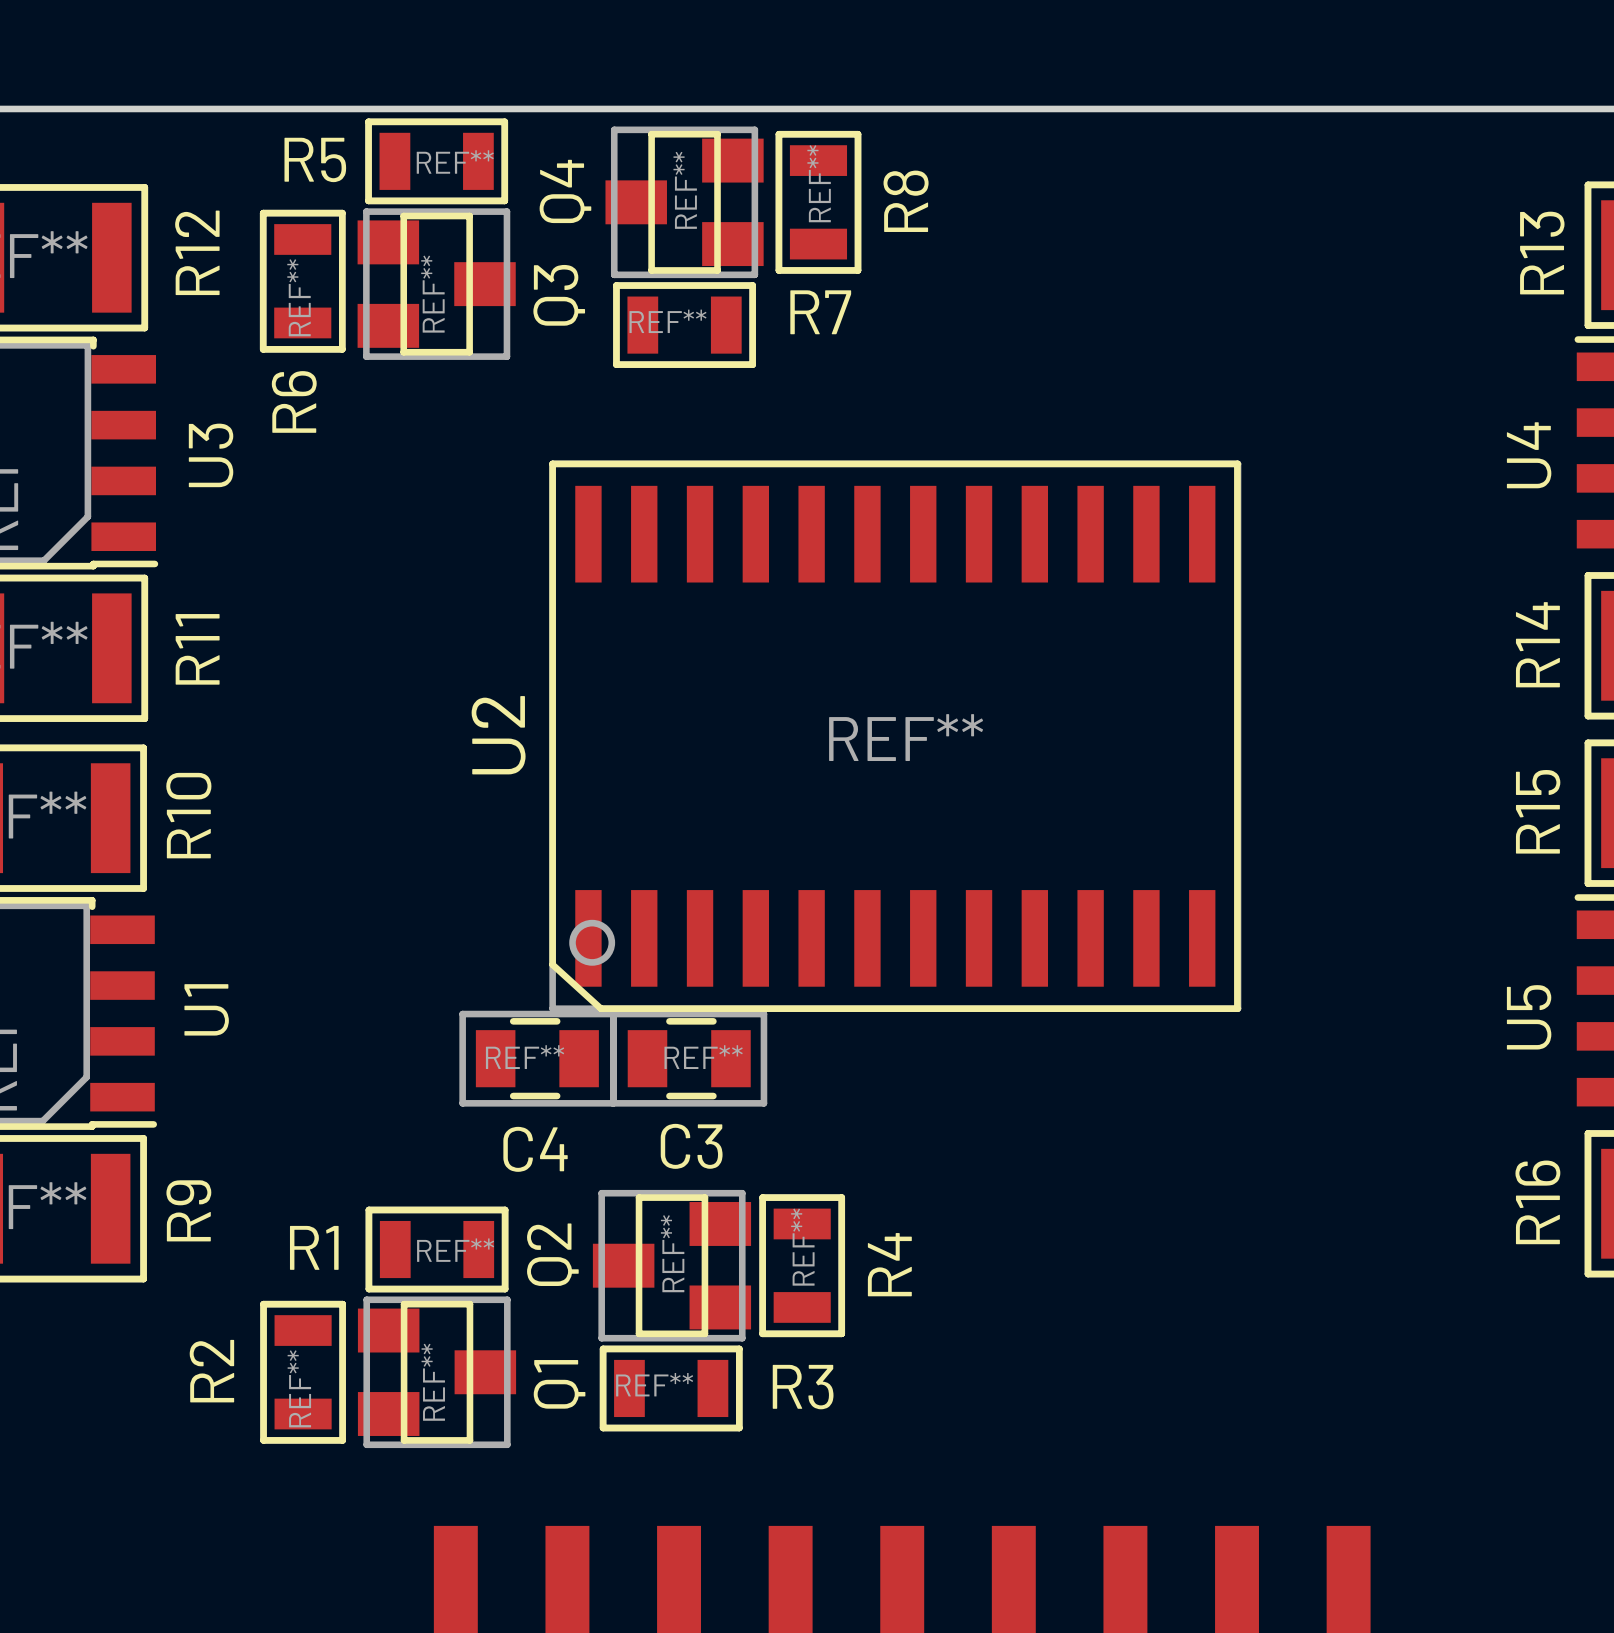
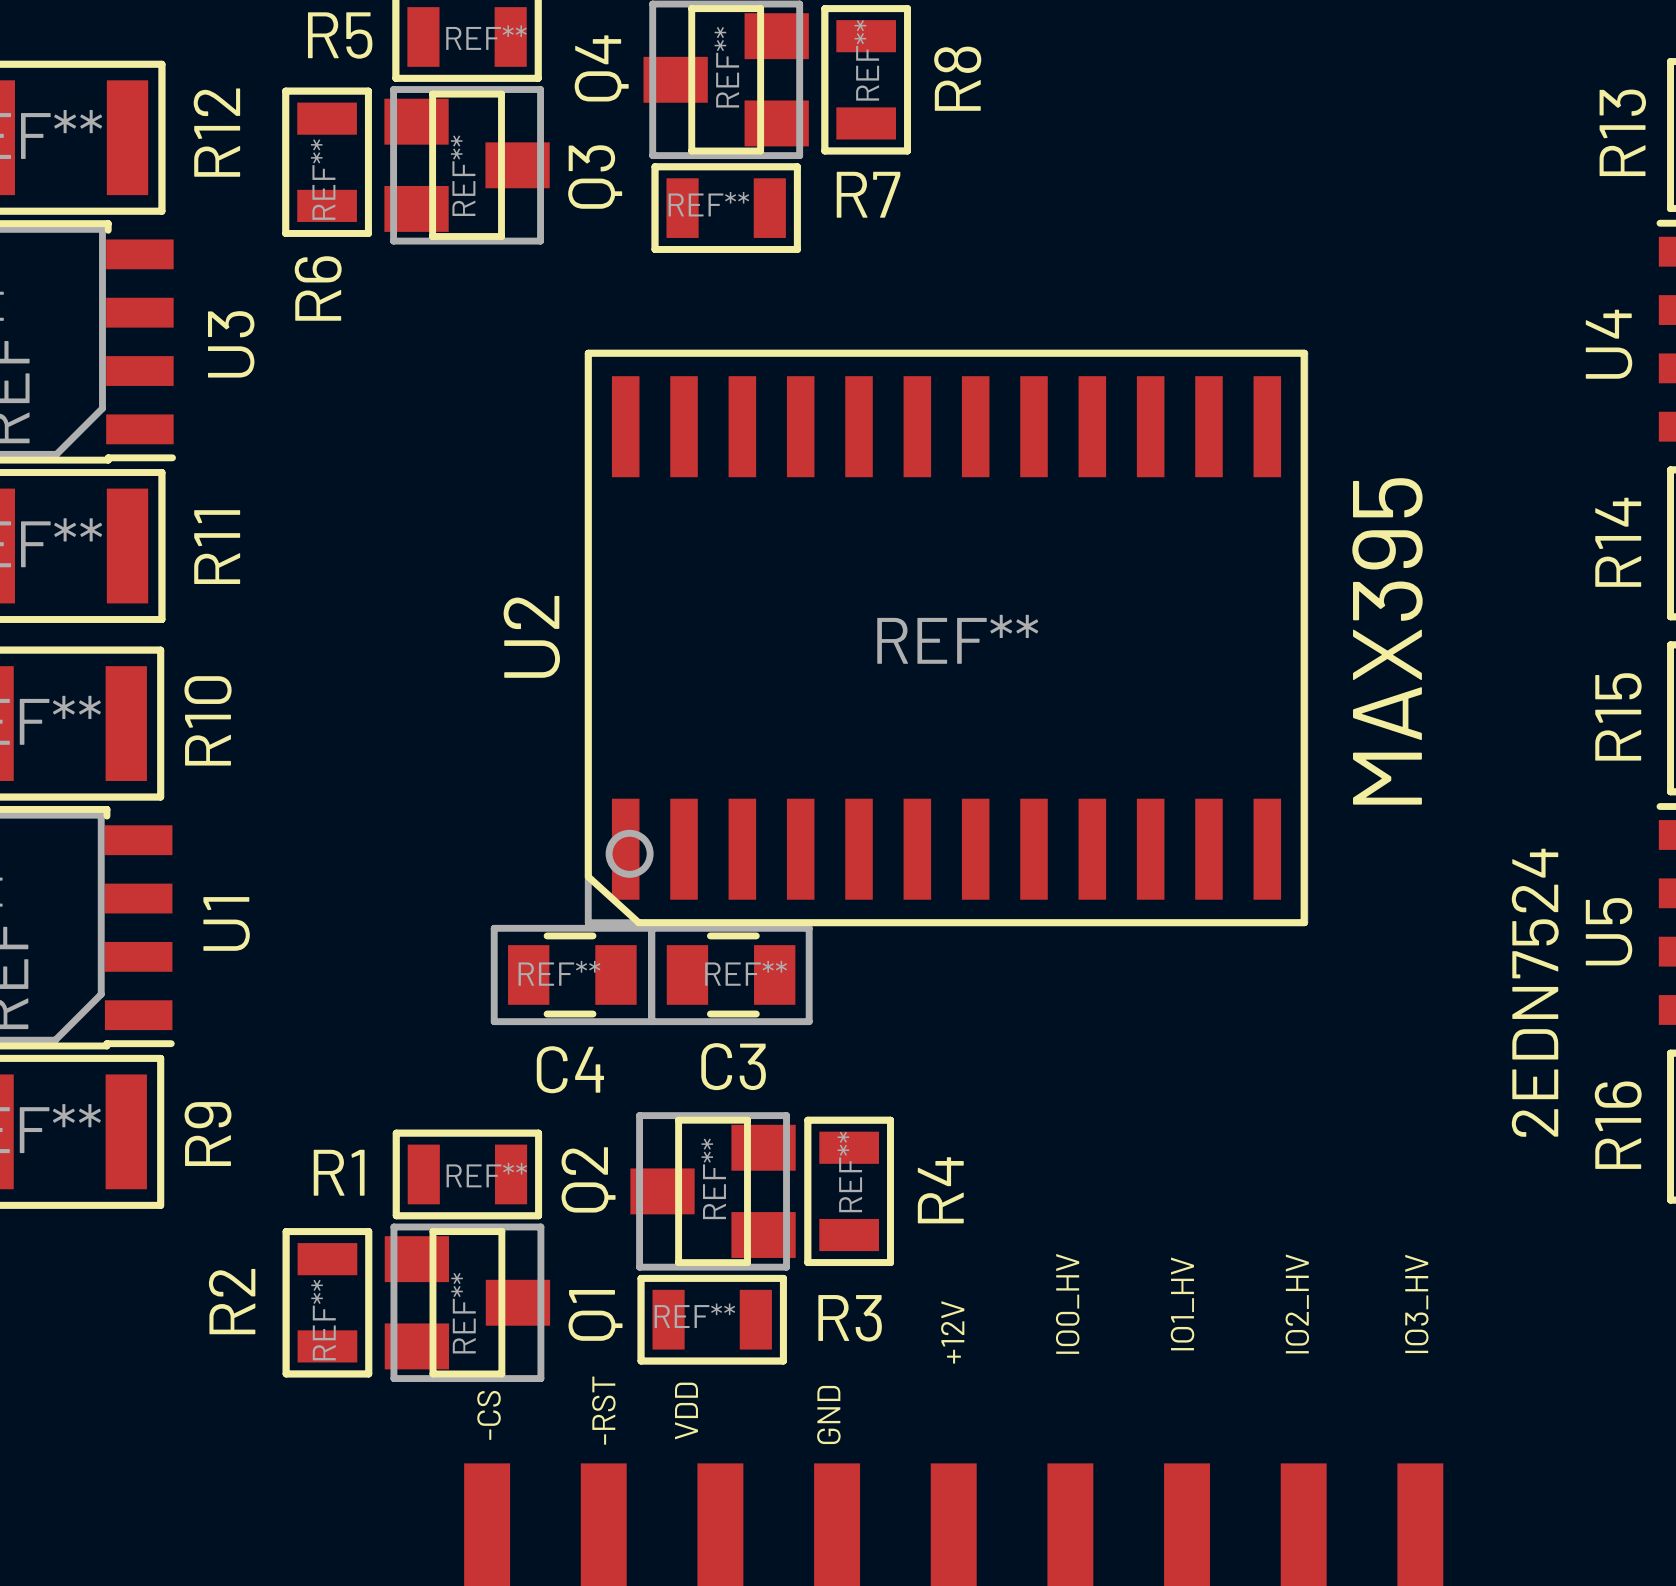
text: none -> MAX395 (1387, 641)
text: none -> 2EDN7524 (1535, 992)
text: none -> IO0_HV (1067, 1303)
text: none -> IO1_HV (1182, 1303)
text: none -> IO2_HV (1297, 1303)
text: none -> IO3_HV (1416, 1303)
text: none -> +12V (952, 1332)
text: none -> -RST (603, 1410)
text: none -> VDD (686, 1410)
text: none -> GND (828, 1414)
text: none -> -CS (489, 1415)

